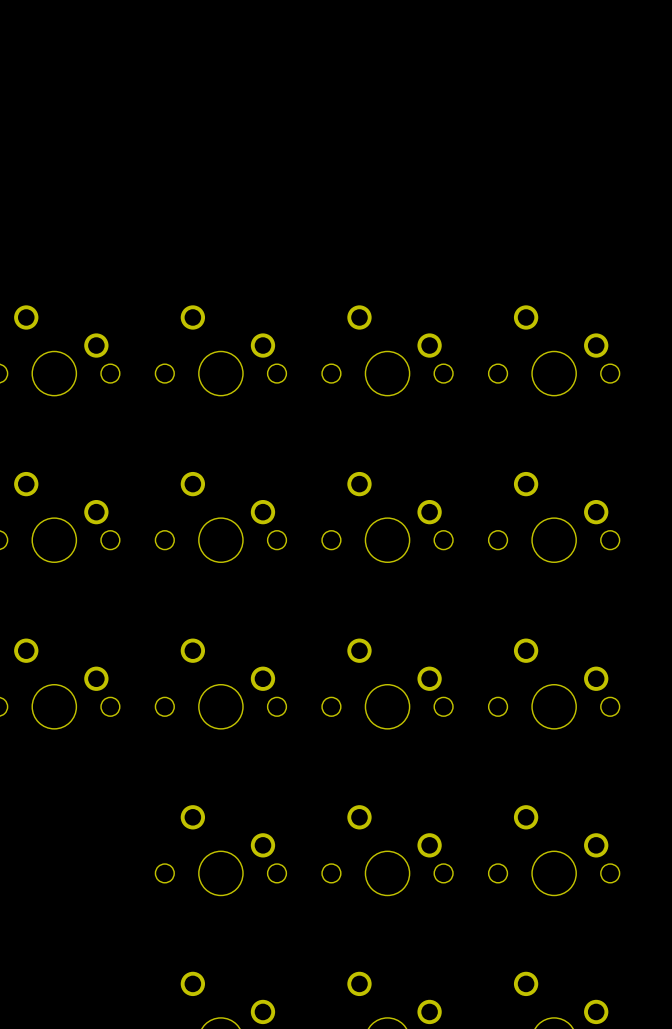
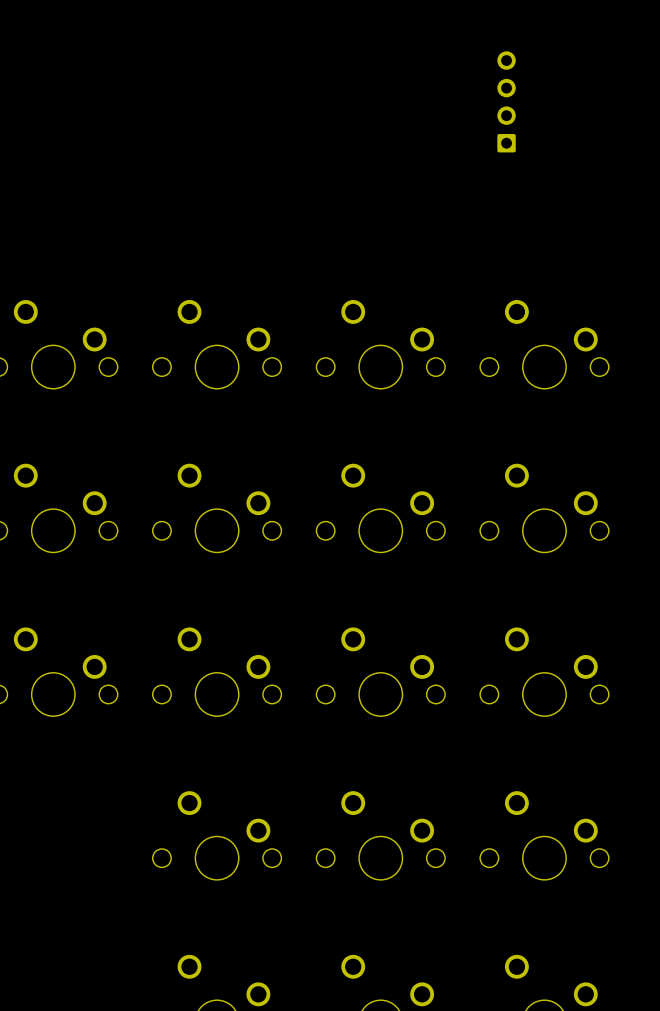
part: none -> (506, 101)

